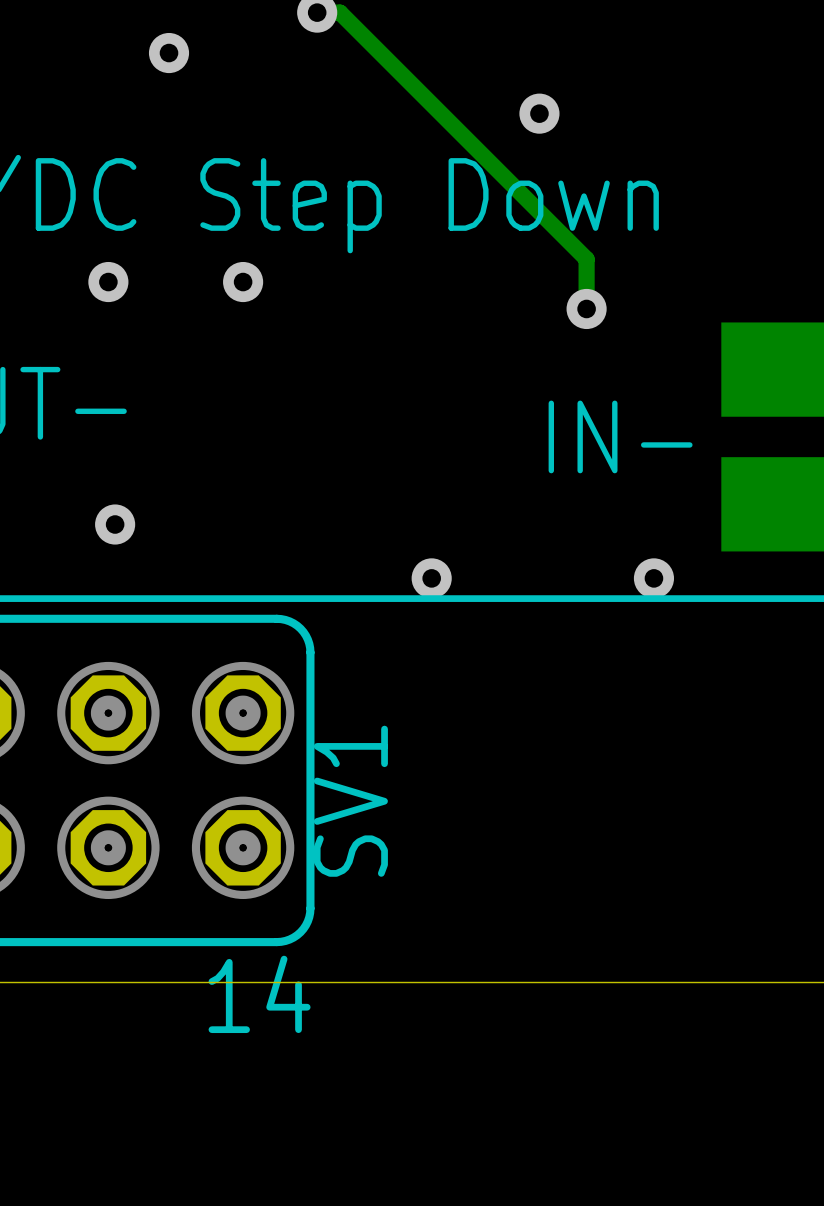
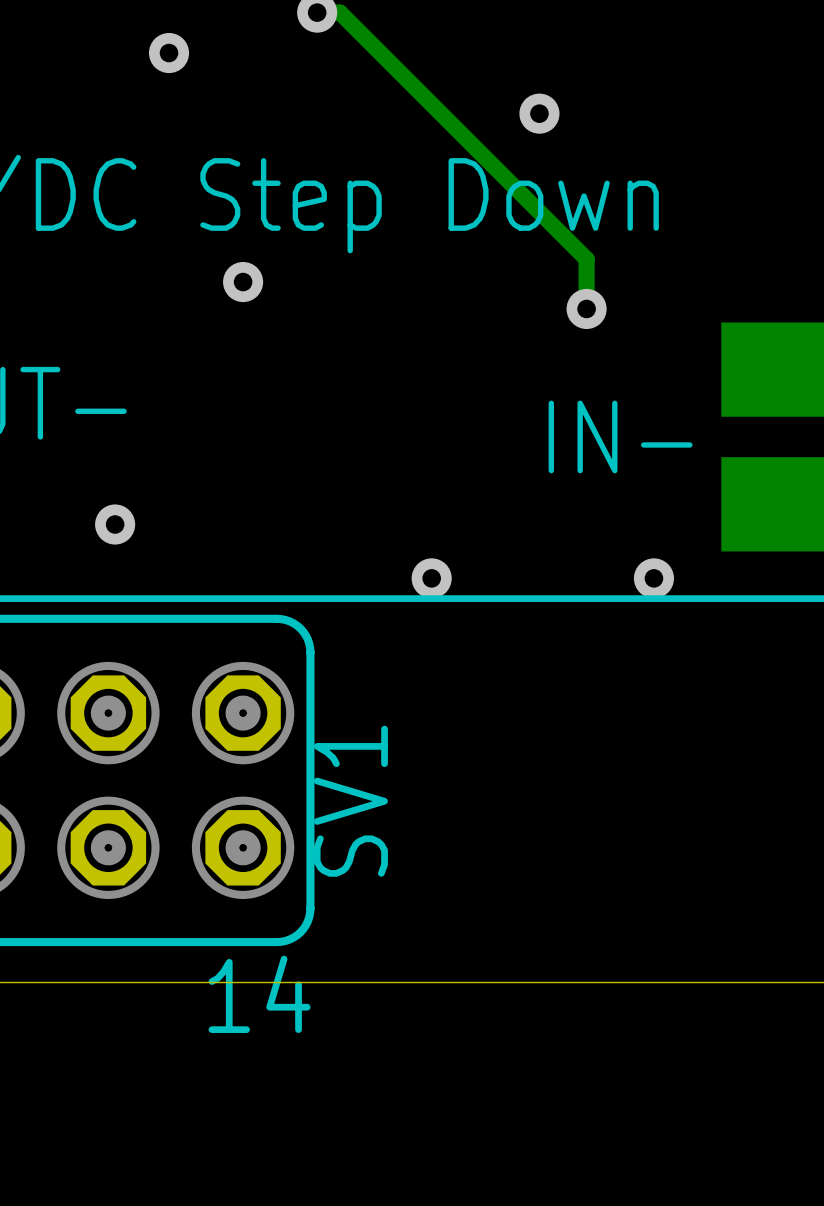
via: (108, 282) -> none

